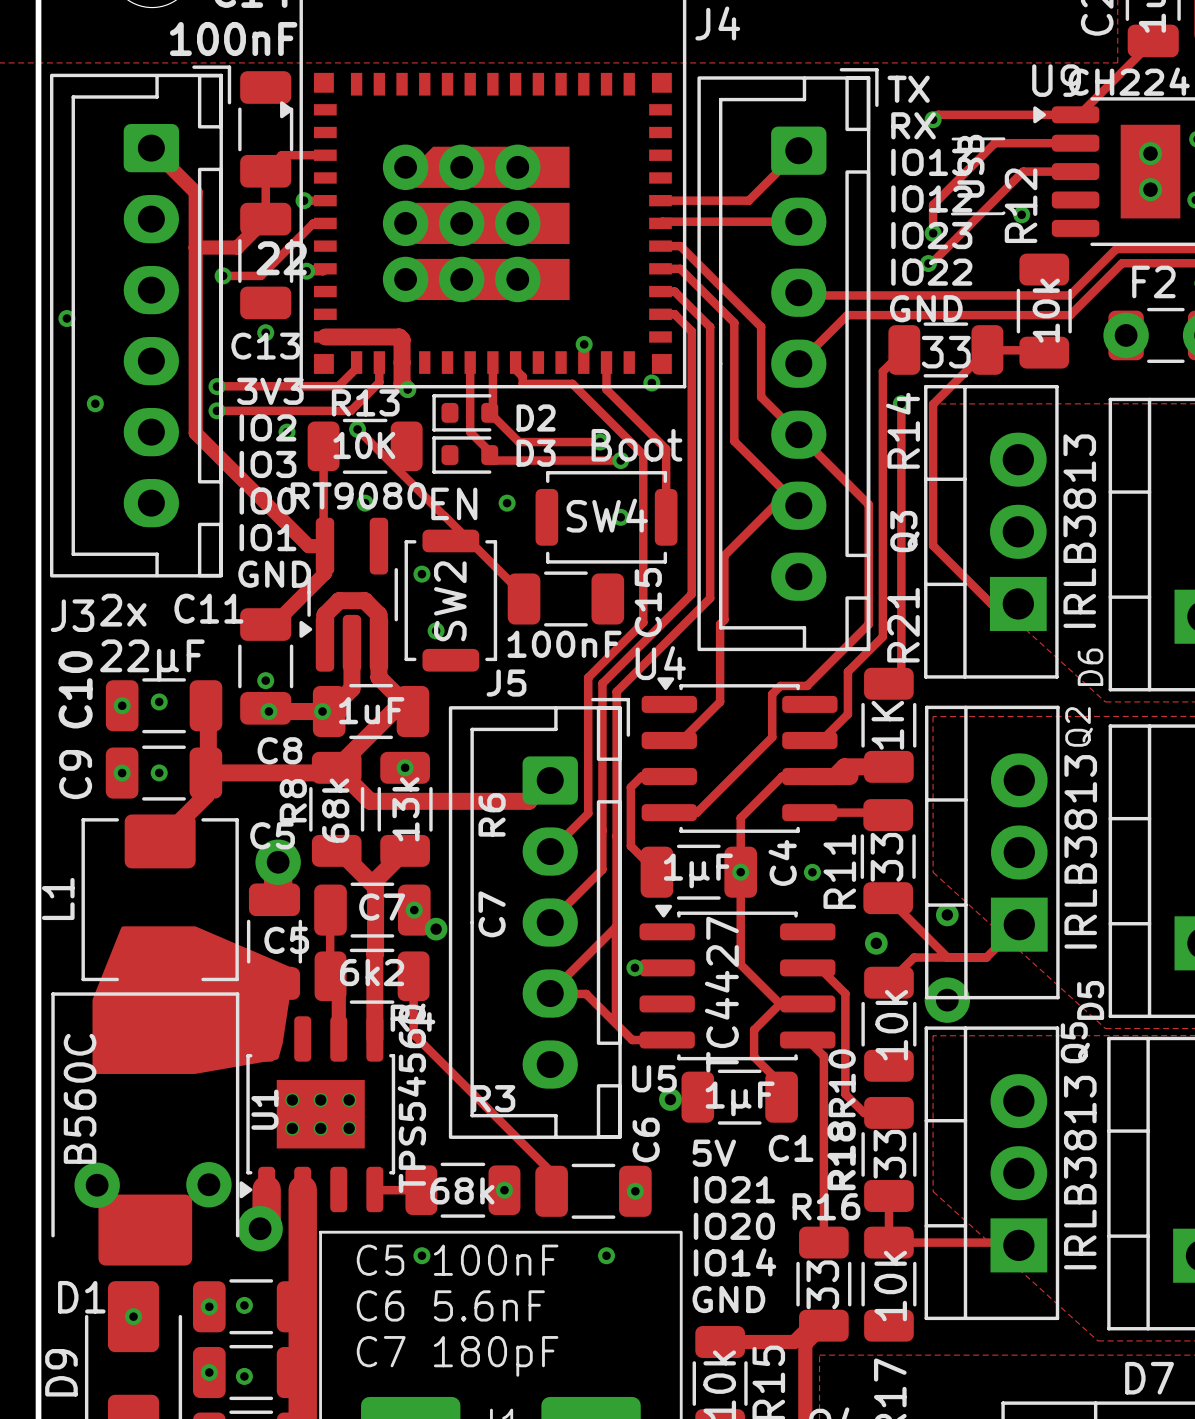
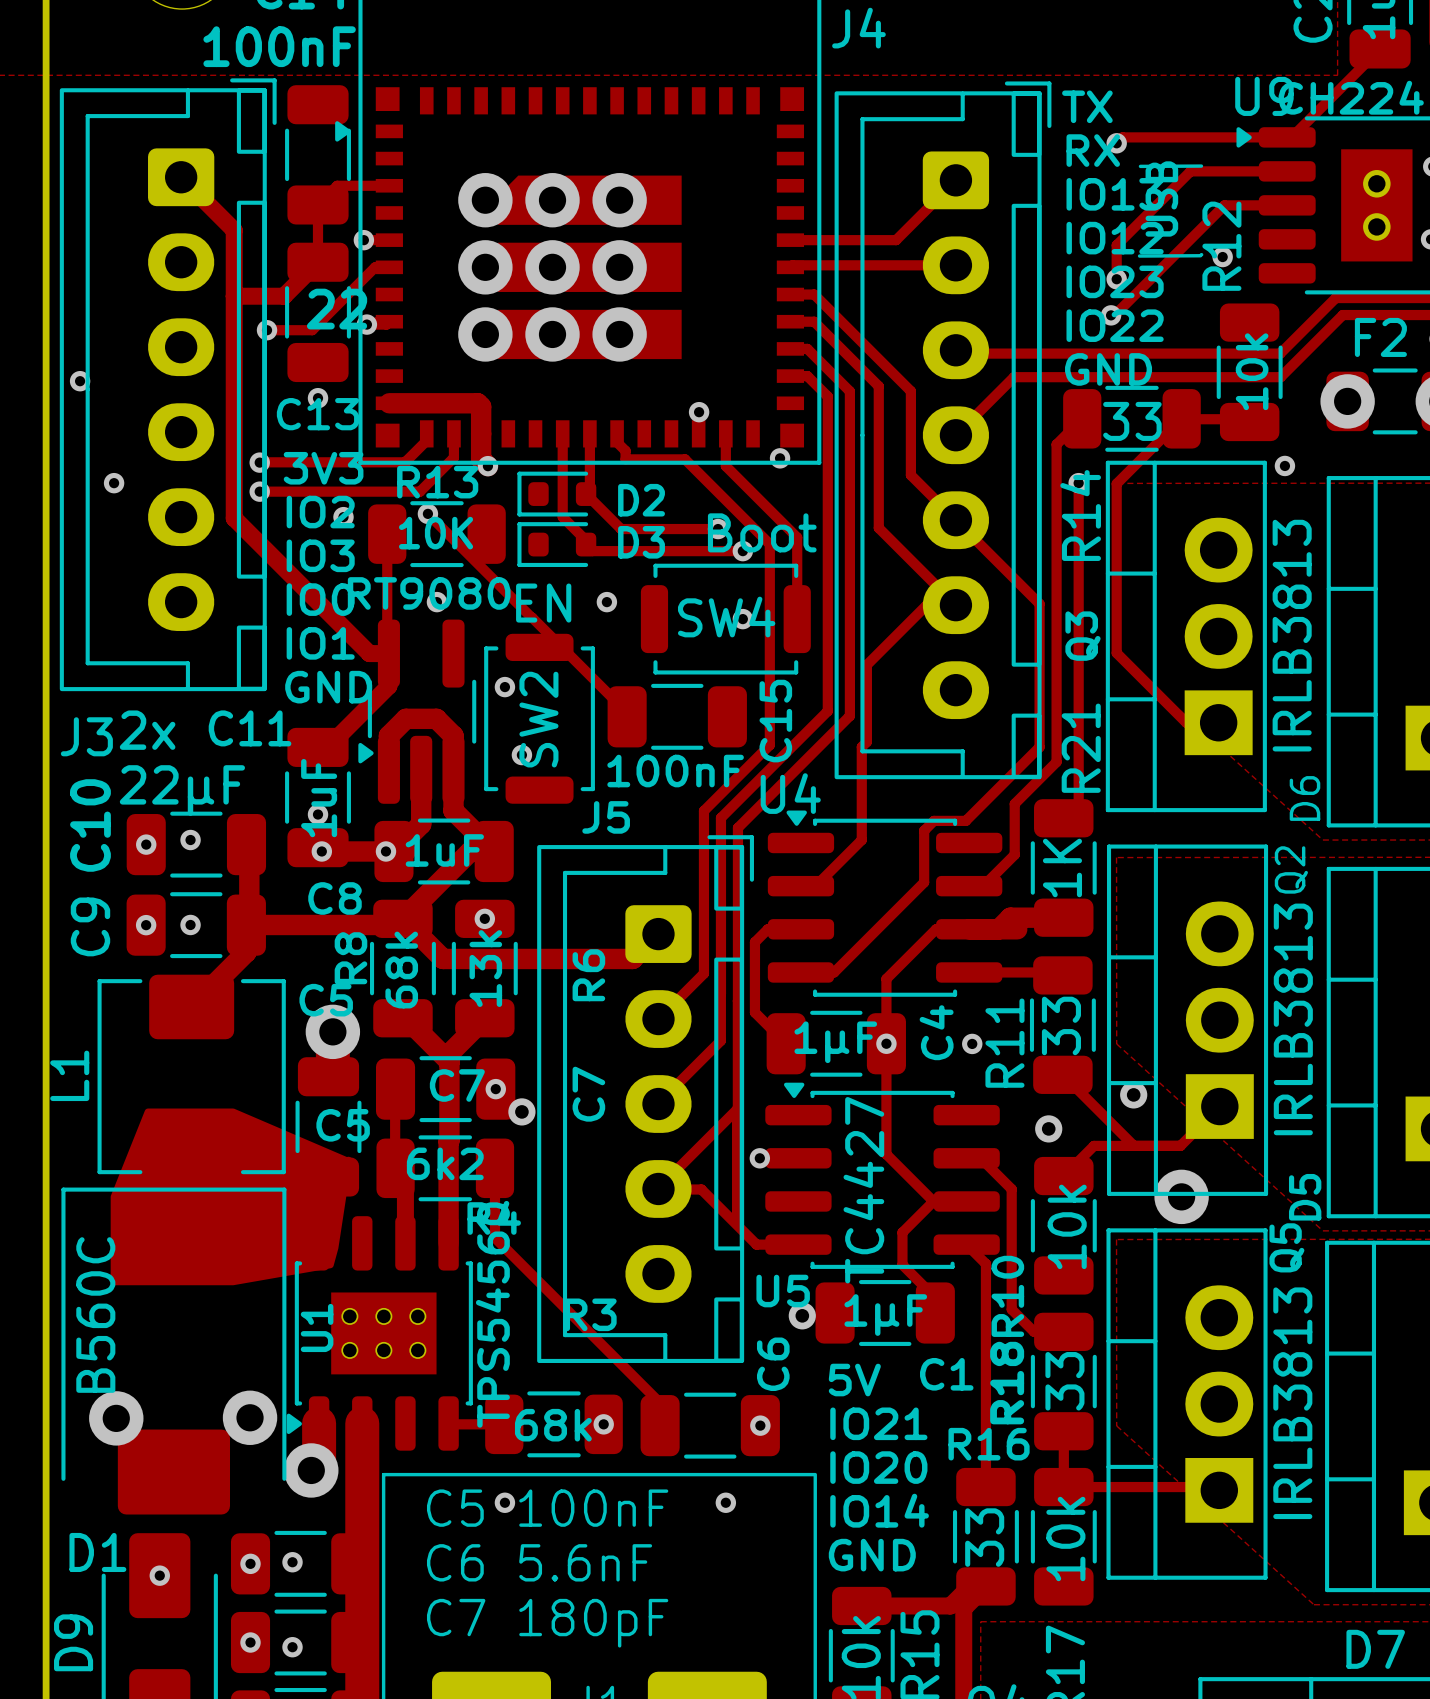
via: none -> (1284, 465)
C11 value: none -> 1uF (319, 798)
via position: (947, 1000) -> (1181, 1196)

